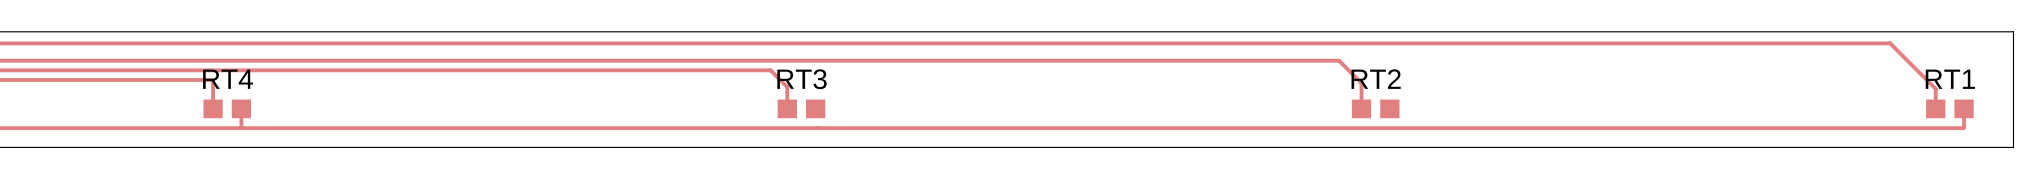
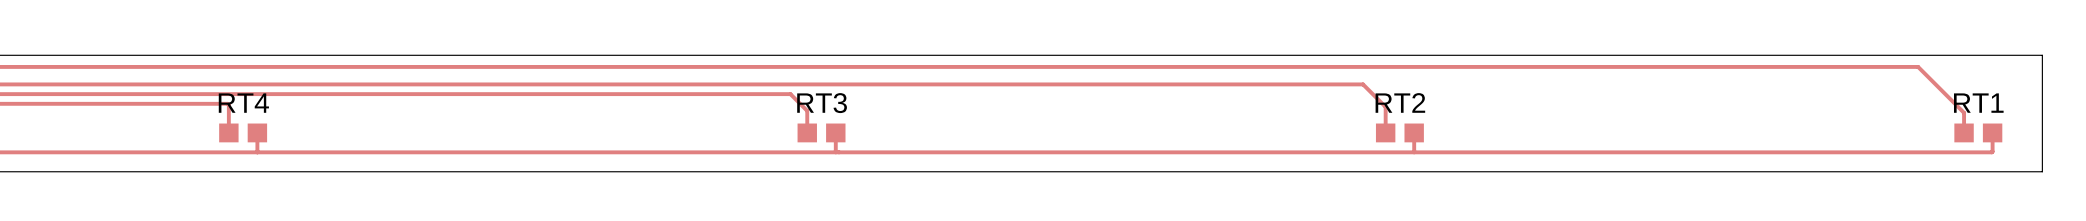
track: none -> (835, 132) (835, 152)
track: none -> (1414, 132) (1414, 152)

